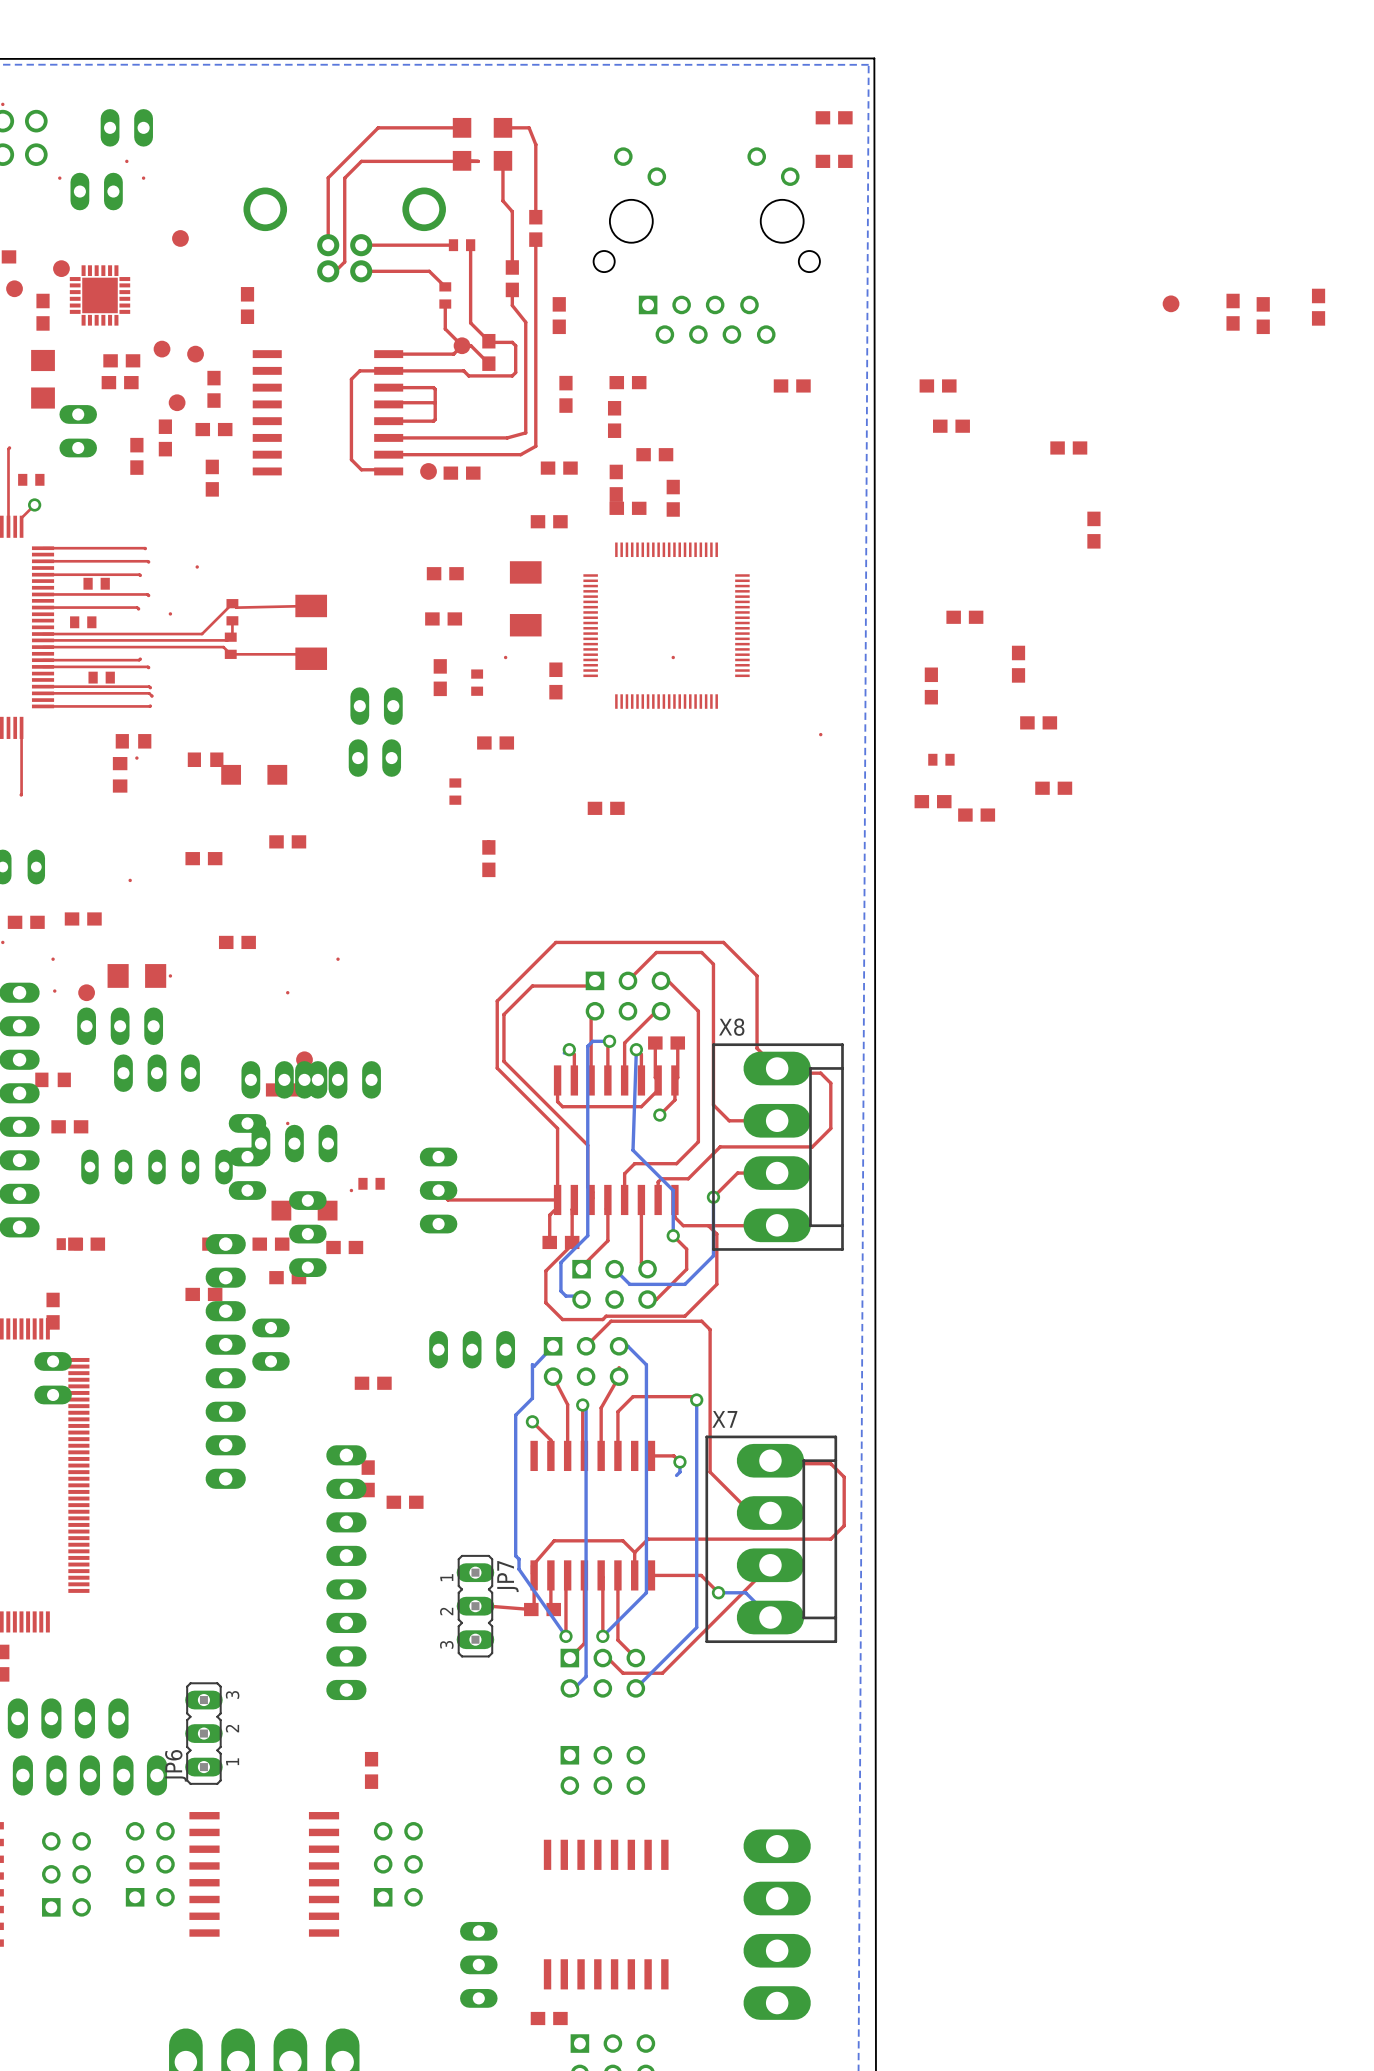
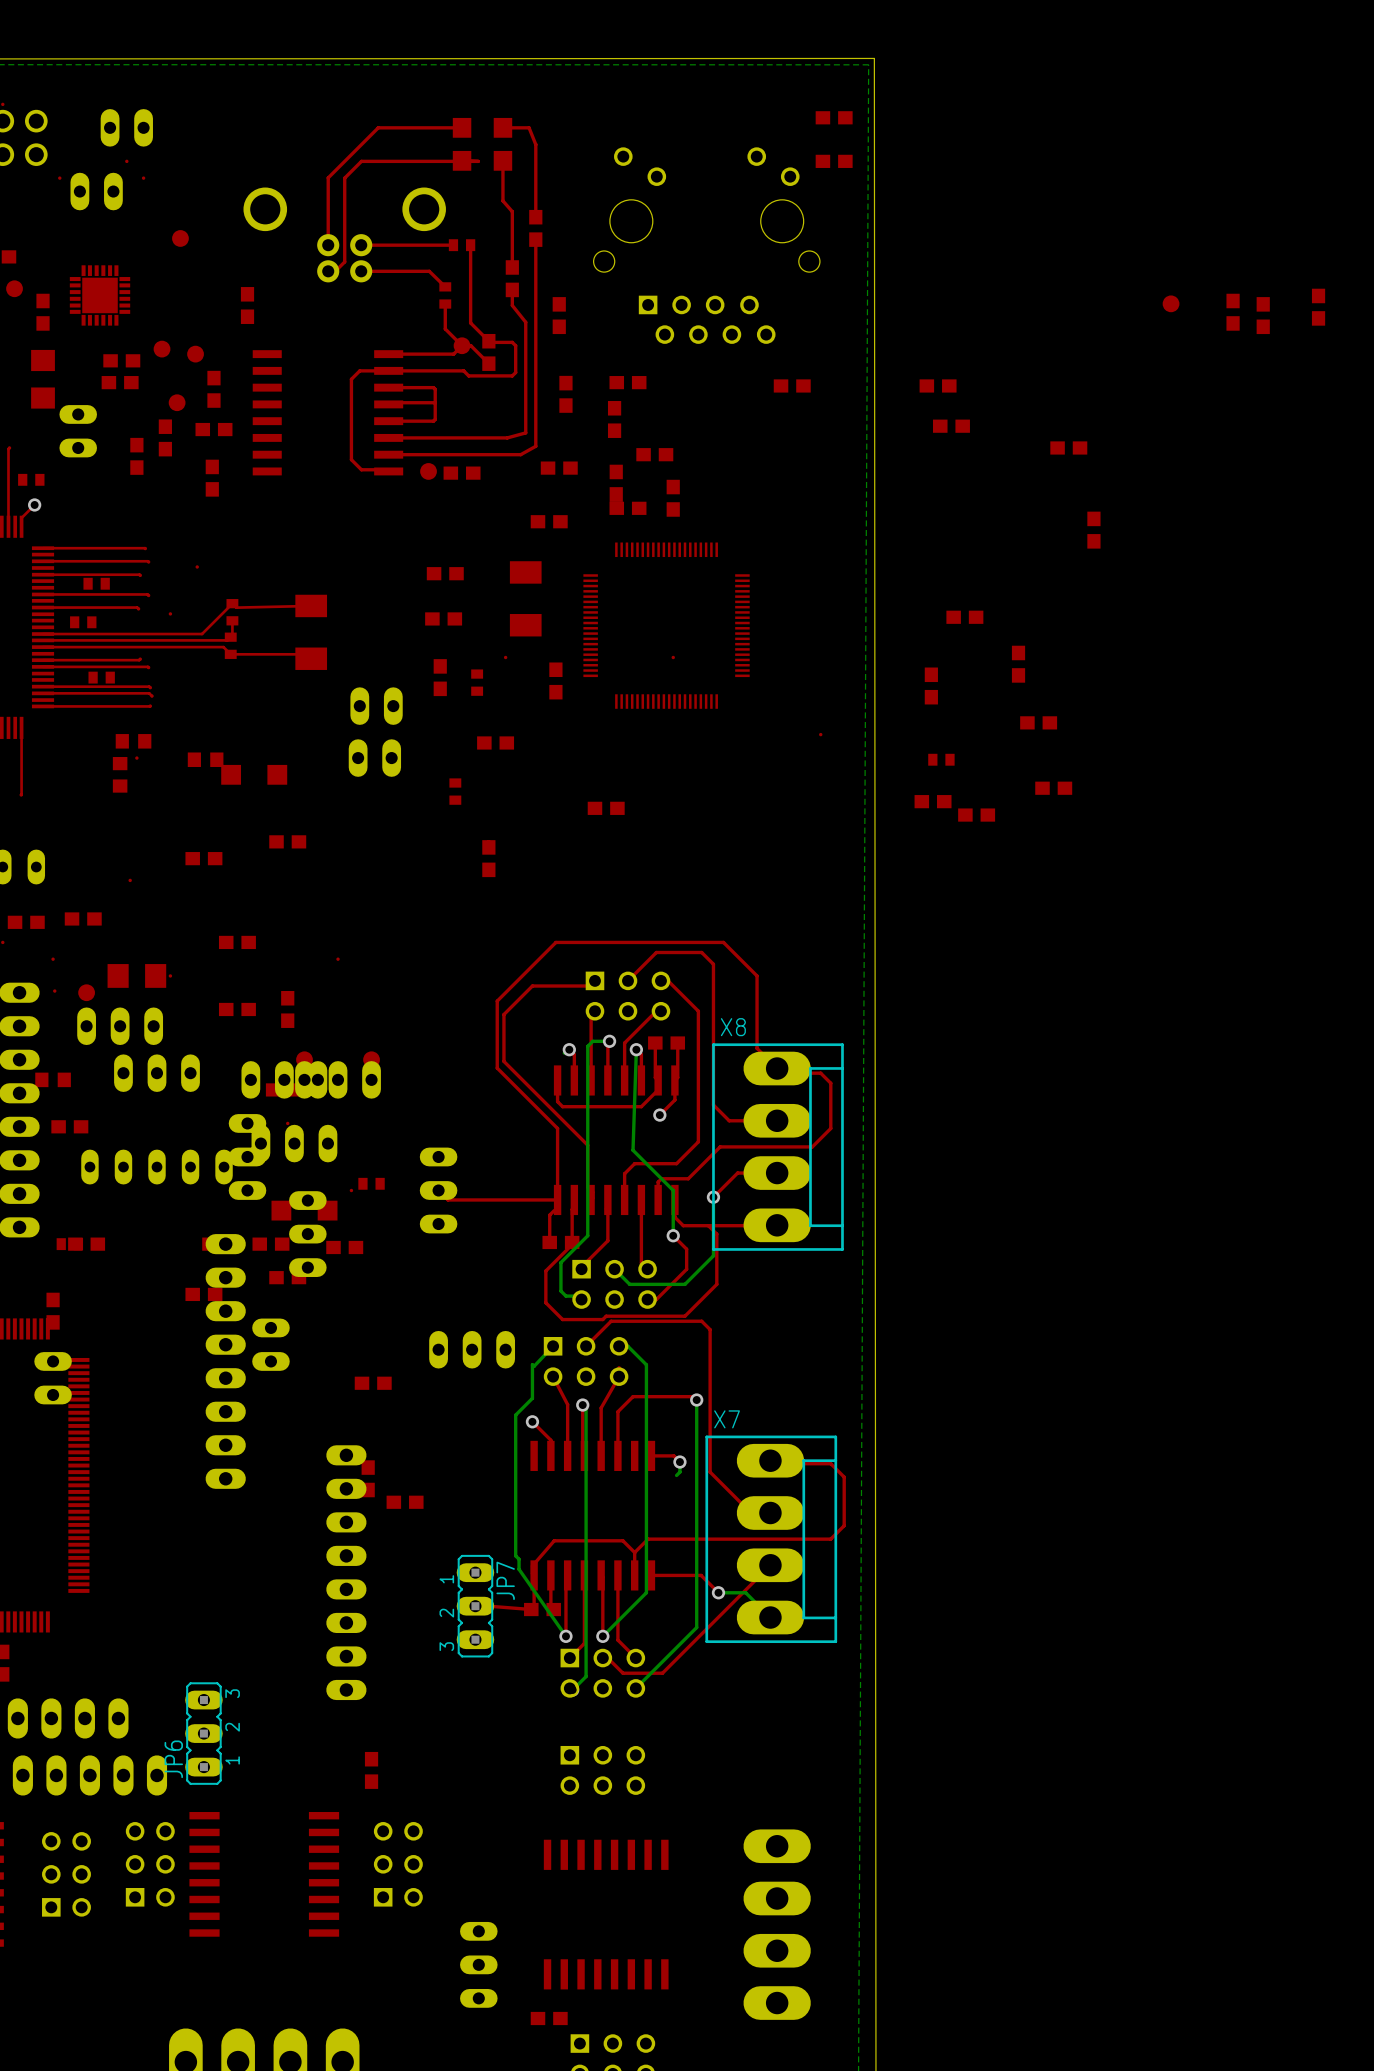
part: (61, 268) -> none
part: none -> (237, 1009)
part: none -> (287, 1009)
part: none -> (371, 1059)

